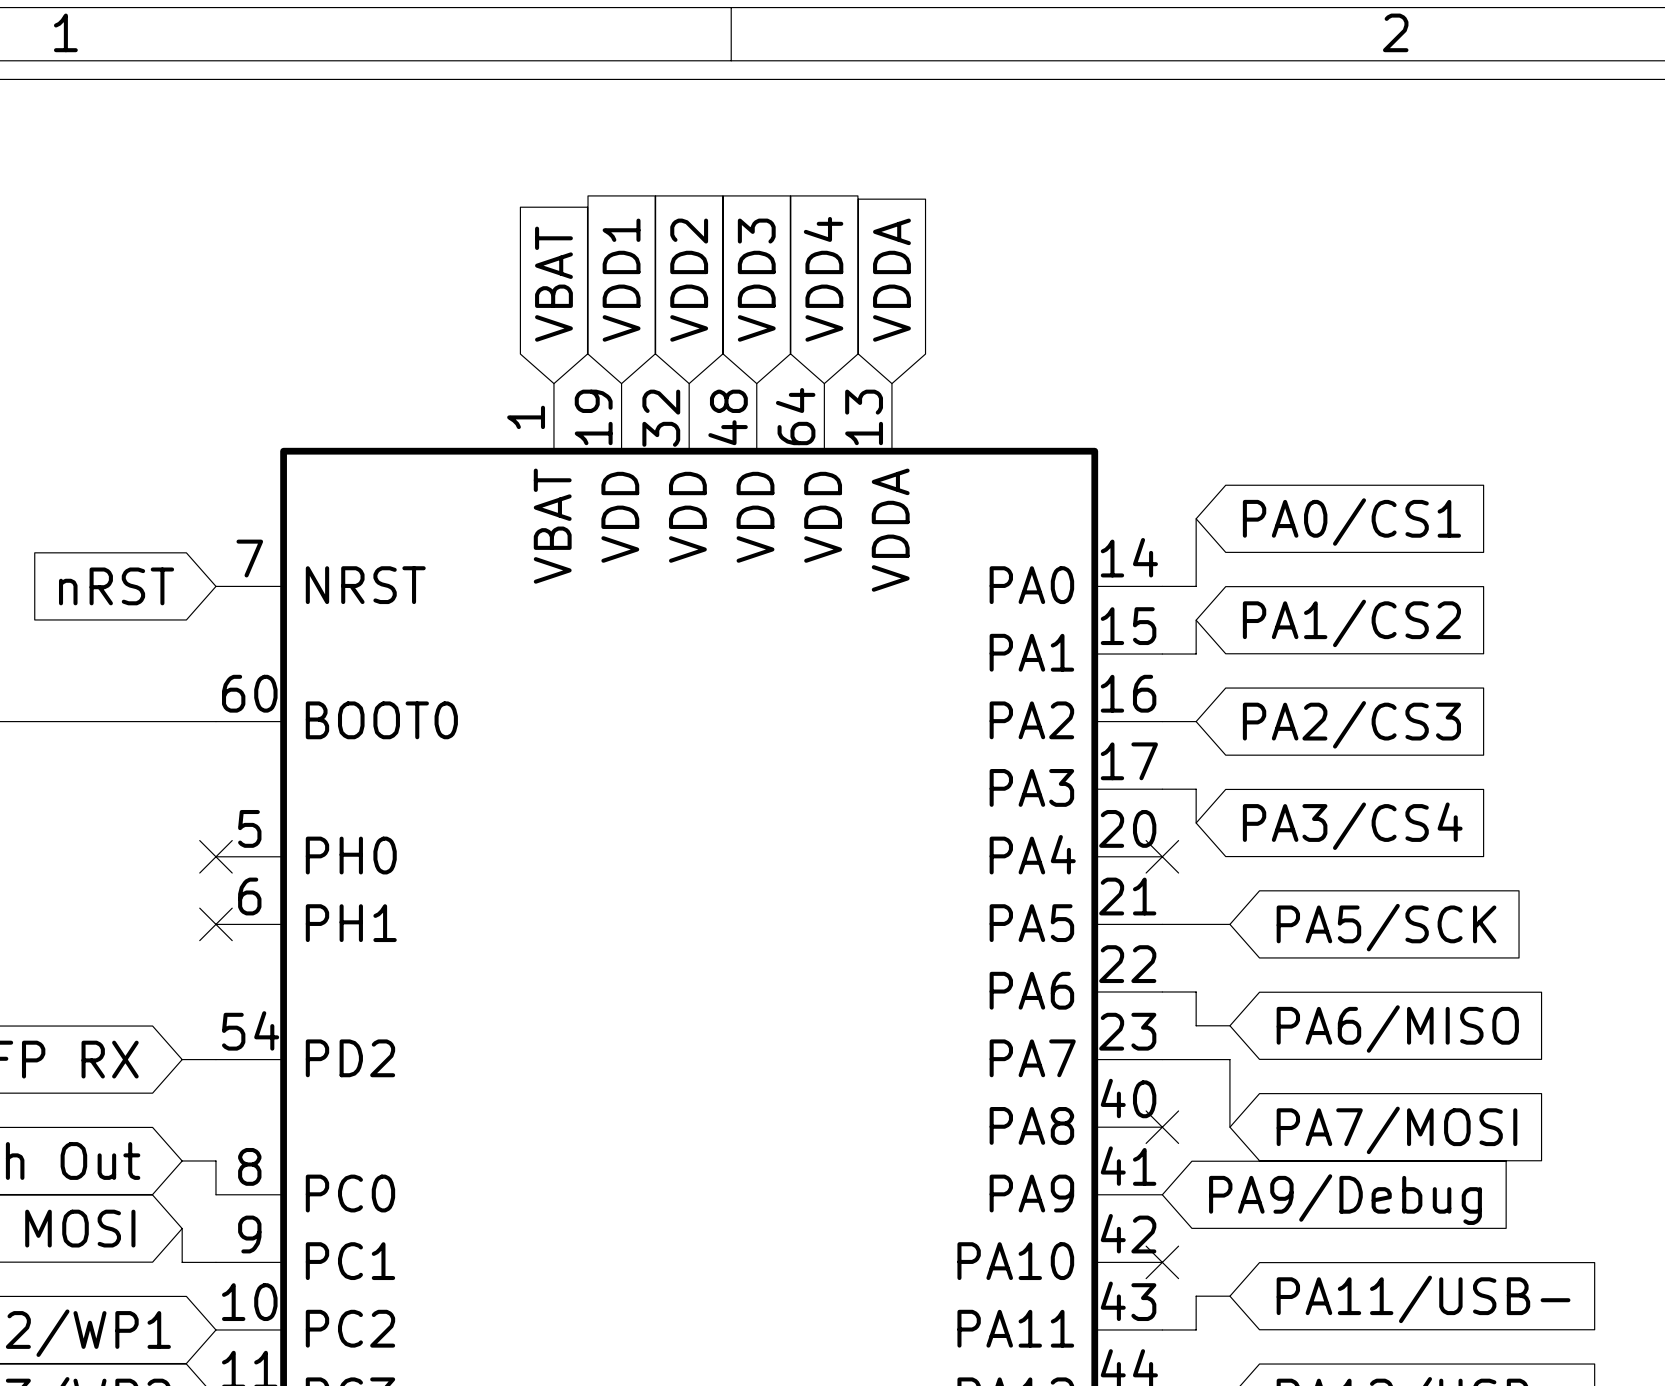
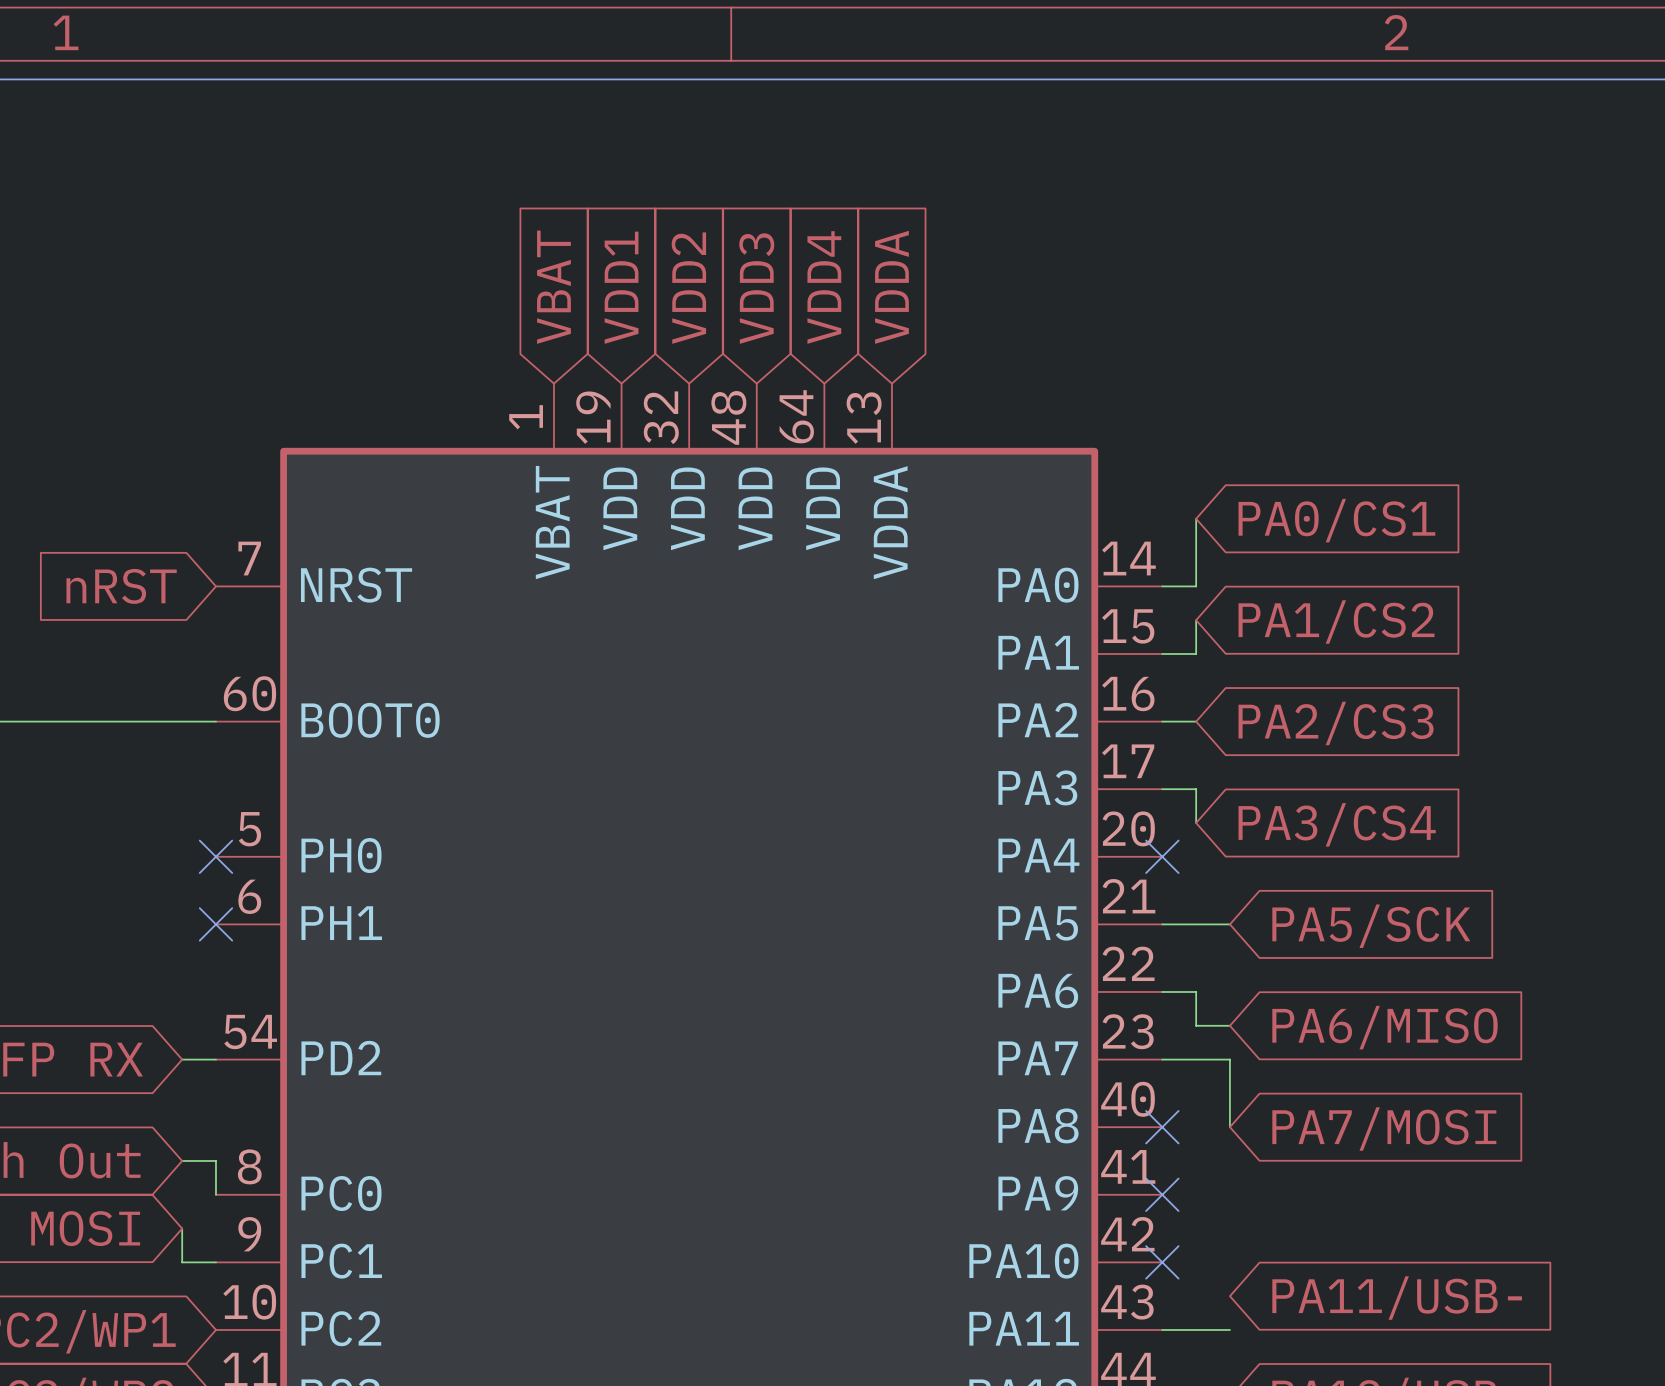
no-connect mark: none -> (1162, 1194)
global label: PA9/Debug (1345, 1199) -> none
wire: (1229, 1296) (1196, 1296) (1196, 1329) -> (1229, 1329) (1196, 1329)

